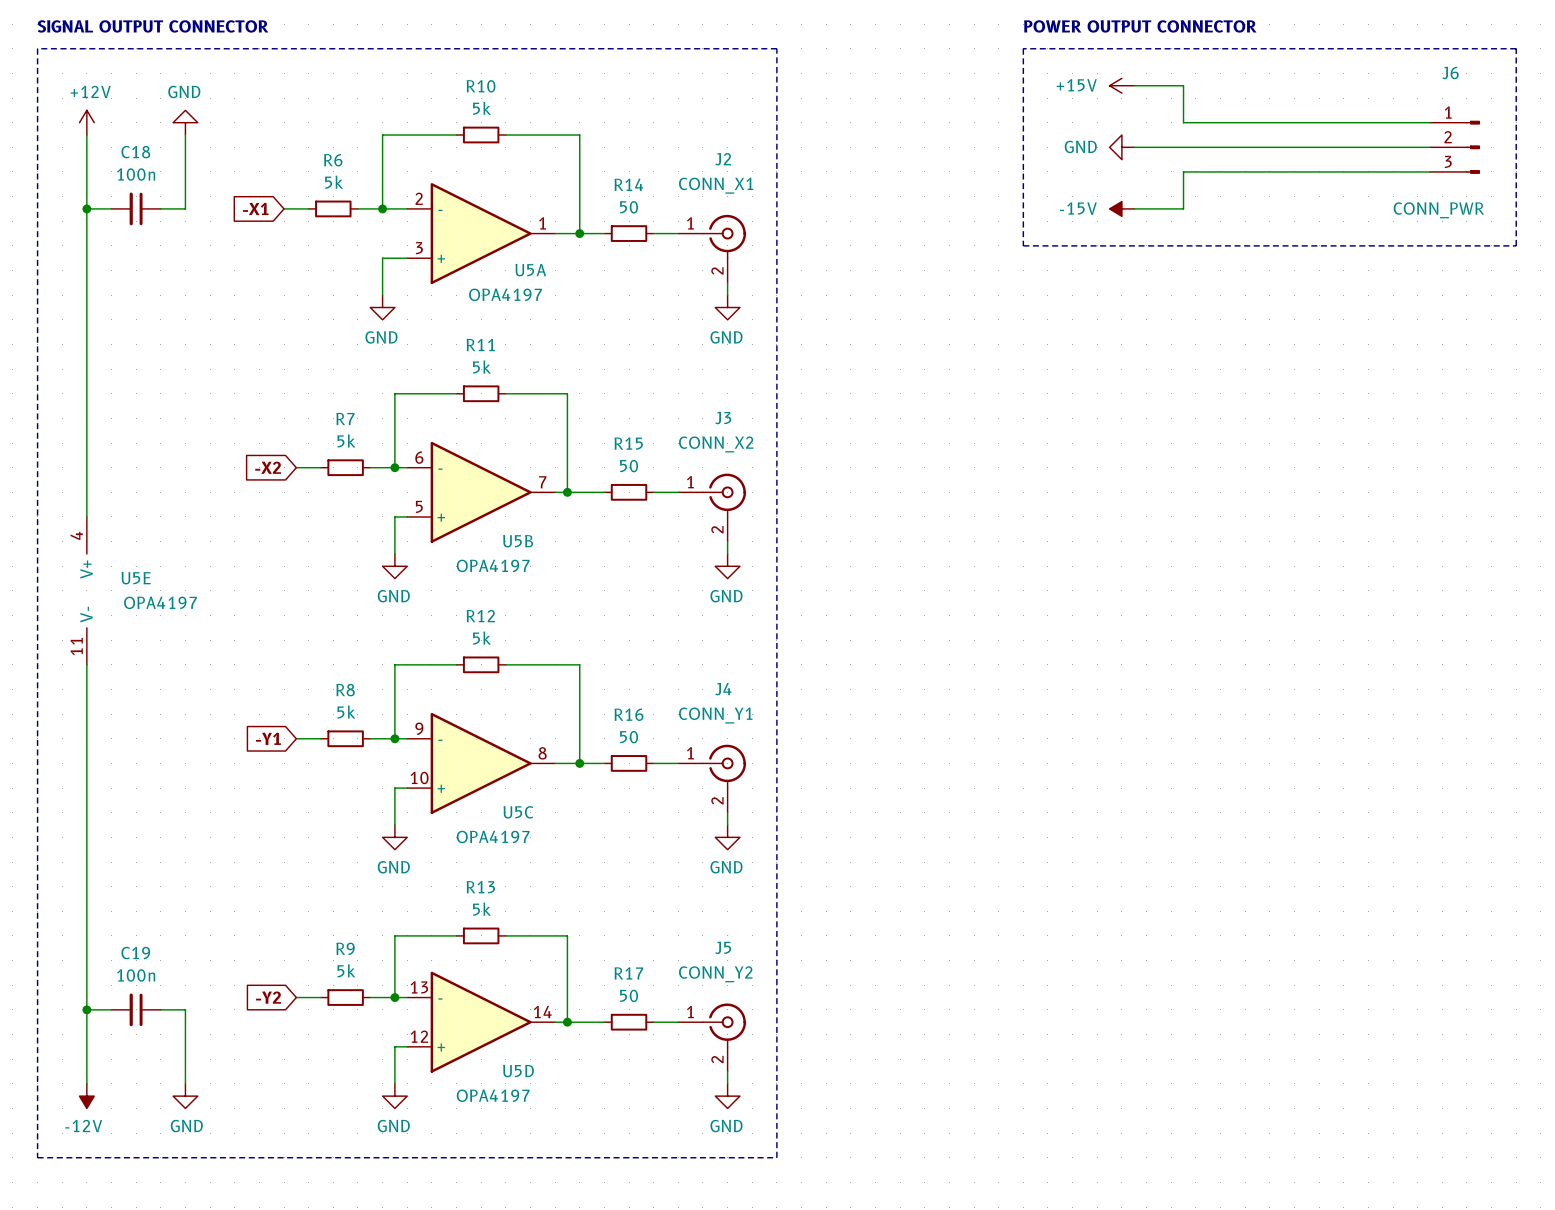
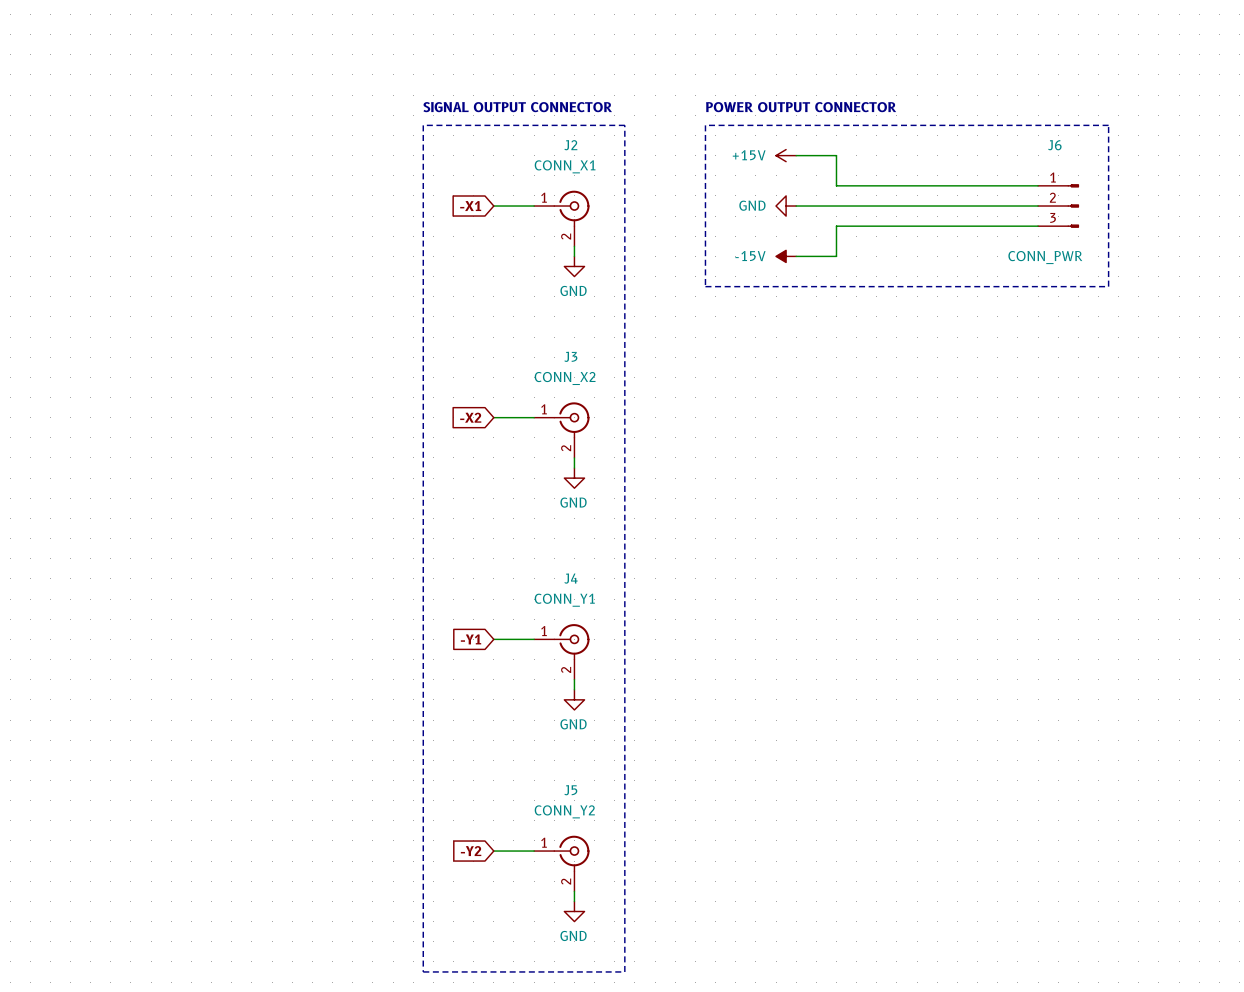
text: SIGNAL OUTPUT CONNECTOR (153, 26) -> none
text position: POWER OUTPUT CONNECTOR (1140, 26) -> POWER OUTPUT CONNECTOR (801, 107)
line: (37, 48) (37, 1157) (776, 1157) (776, 48) (37, 48) -> none
line: (1023, 48) (1516, 48) (1516, 245) (1023, 245) (1023, 48) -> (705, 125) (1108, 125) (1108, 286) (705, 286) (705, 125)
power symbol position: +15V (1121, 85) -> +15V (786, 155)
wire: (1134, 85) (1183, 85) (1183, 122) (1429, 122) -> none
text: none -> SIGNAL OUTPUT CONNECTOR (517, 107)
power symbol: +12V (86, 122) -> none
power symbol: GND (185, 122) -> none
wire: (86, 135) (86, 516) -> none
wire: (185, 135) (185, 208) (160, 208) -> none
wire: (456, 135) (382, 135) (382, 208) -> none
R10: 5k (481, 135) -> none
wire: (505, 135) (579, 135) (579, 233) -> none
line: none -> (423, 125) (423, 971) (624, 971) (624, 125) (423, 125)
power symbol position: GND (1121, 147) -> GND (786, 206)
wire: (1134, 147) (1429, 147) -> (796, 206) (1038, 206)
J6 position: (1454, 147) -> (1058, 206)
wire: none -> (796, 155) (836, 155) (836, 185) (907, 185)
wire: (1429, 171) (1183, 171) (1183, 208) -> (1038, 185) (947, 185)
wire: (86, 208) (111, 208) -> none
junction: (86, 208) -> none
C18: 100n (136, 208) -> none
global label: -X1 (255, 208) -> none
wire: (284, 208) (308, 208) -> none
R6: 5k (333, 208) -> none
wire: (357, 208) (407, 208) -> none
junction: (382, 208) -> none
power symbol position: -15V (1121, 208) -> -15V (786, 256)
U5A: OPA4197 (481, 233) -> none
wire: (555, 233) (604, 233) -> none
junction: (579, 233) -> none
global label: none -> -X1 (470, 206)
wire: none -> (493, 206) (513, 206)
R14: 50 (629, 233) -> none
wire: (407, 258) (382, 258) (382, 295) -> none
wire: none -> (1038, 226) (836, 226) (836, 256) (796, 256)
power symbol: GND (382, 307) -> none
wire: (456, 393) (394, 393) (394, 467) -> none
R11: 5k (481, 393) -> none
wire: (505, 393) (567, 393) (567, 492) -> none
global label: -X2 (268, 467) -> none
wire: (296, 467) (320, 467) -> none
R7: 5k (345, 467) -> none
wire: (370, 467) (407, 467) -> none
junction: (394, 467) -> none
U5B: OPA4197 (481, 492) -> none
wire: (555, 492) (604, 492) -> none
junction: (567, 492) -> none
global label: none -> -X2 (470, 417)
wire: none -> (493, 417) (513, 417)
R15: 50 (629, 492) -> none
wire: (407, 516) (394, 516) (394, 553) -> none
power symbol: GND (394, 566) -> none
U5E: OPA4197 (86, 590) -> none
wire: (86, 664) (86, 1083) -> none
wire: (456, 664) (394, 664) (394, 738) -> none
R12: 5k (481, 664) -> none
wire: (505, 664) (579, 664) (579, 763) -> none
global label: -Y1 (268, 738) -> none
wire: (296, 738) (320, 738) -> none
R8: 5k (345, 738) -> none
wire: (370, 738) (407, 738) -> none
junction: (394, 738) -> none
U5C: OPA4197 (481, 763) -> none
wire: (555, 763) (604, 763) -> none
junction: (579, 763) -> none
global label: none -> -Y1 (471, 639)
wire: none -> (493, 639) (513, 639)
R16: 50 (629, 763) -> none
wire: (407, 788) (394, 788) (394, 825) -> none
power symbol: GND (394, 837) -> none
wire: (456, 935) (394, 935) (394, 997) -> none
R13: 5k (481, 935) -> none
wire: (505, 935) (567, 935) (567, 1022) -> none
global label: -Y2 (268, 997) -> none
wire: (296, 997) (320, 997) -> none
R9: 5k (345, 997) -> none
wire: (370, 997) (407, 997) -> none
junction: (394, 997) -> none
wire: (86, 1009) (111, 1009) -> none
junction: (86, 1009) -> none
C19: 100n (136, 1009) -> none
wire: (160, 1009) (185, 1009) (185, 1083) -> none
U5D: OPA4197 (481, 1022) -> none
wire: (555, 1022) (604, 1022) -> none
junction: (567, 1022) -> none
global label: none -> -Y2 (471, 851)
wire: none -> (493, 851) (513, 851)
R17: 50 (629, 1022) -> none
wire: (407, 1046) (394, 1046) (394, 1083) -> none
power symbol: -12V (86, 1096) -> none
power symbol: GND (185, 1096) -> none
power symbol: GND (394, 1096) -> none

